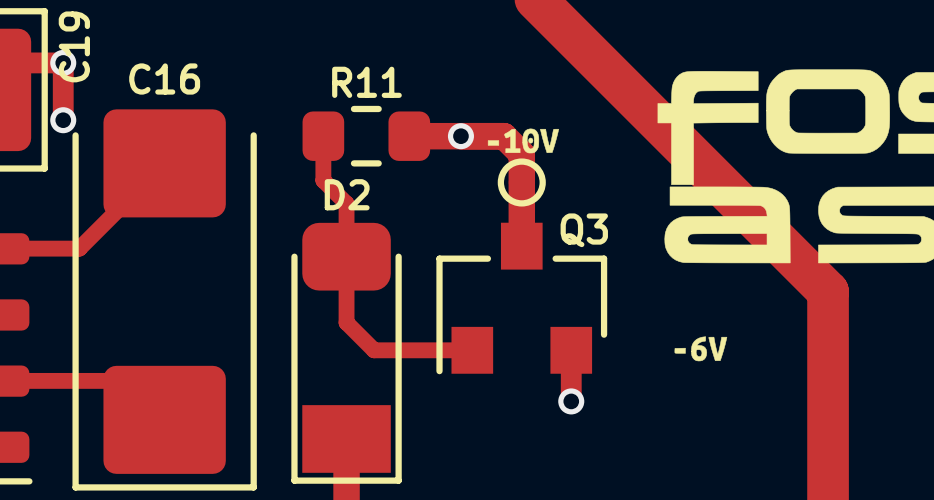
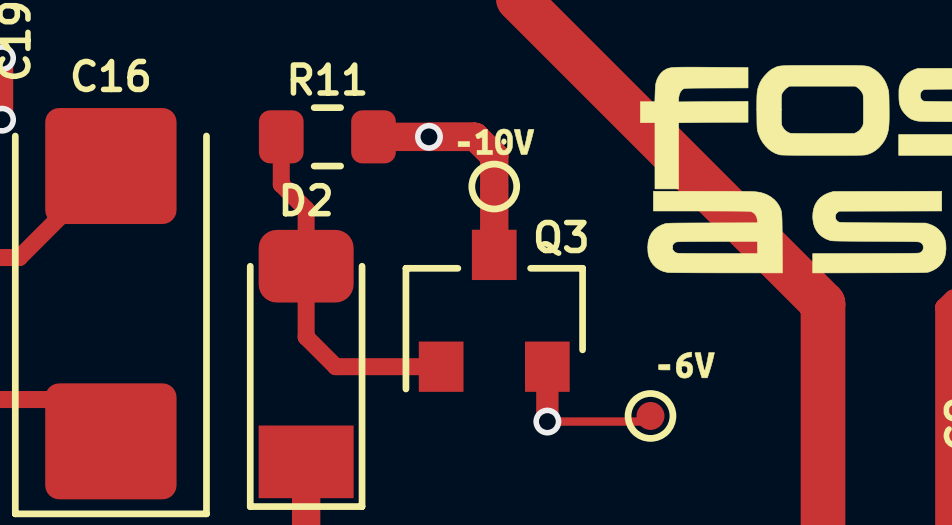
track: none -> (650, 415) (644, 421) (547, 421)
part: none -> (650, 415)

